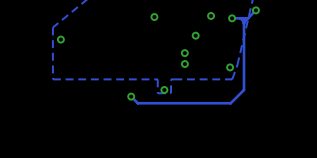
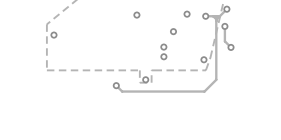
track: none -> (224, 26) (224, 41) (231, 47)
via: none -> (224, 26)
via: none -> (231, 47)

